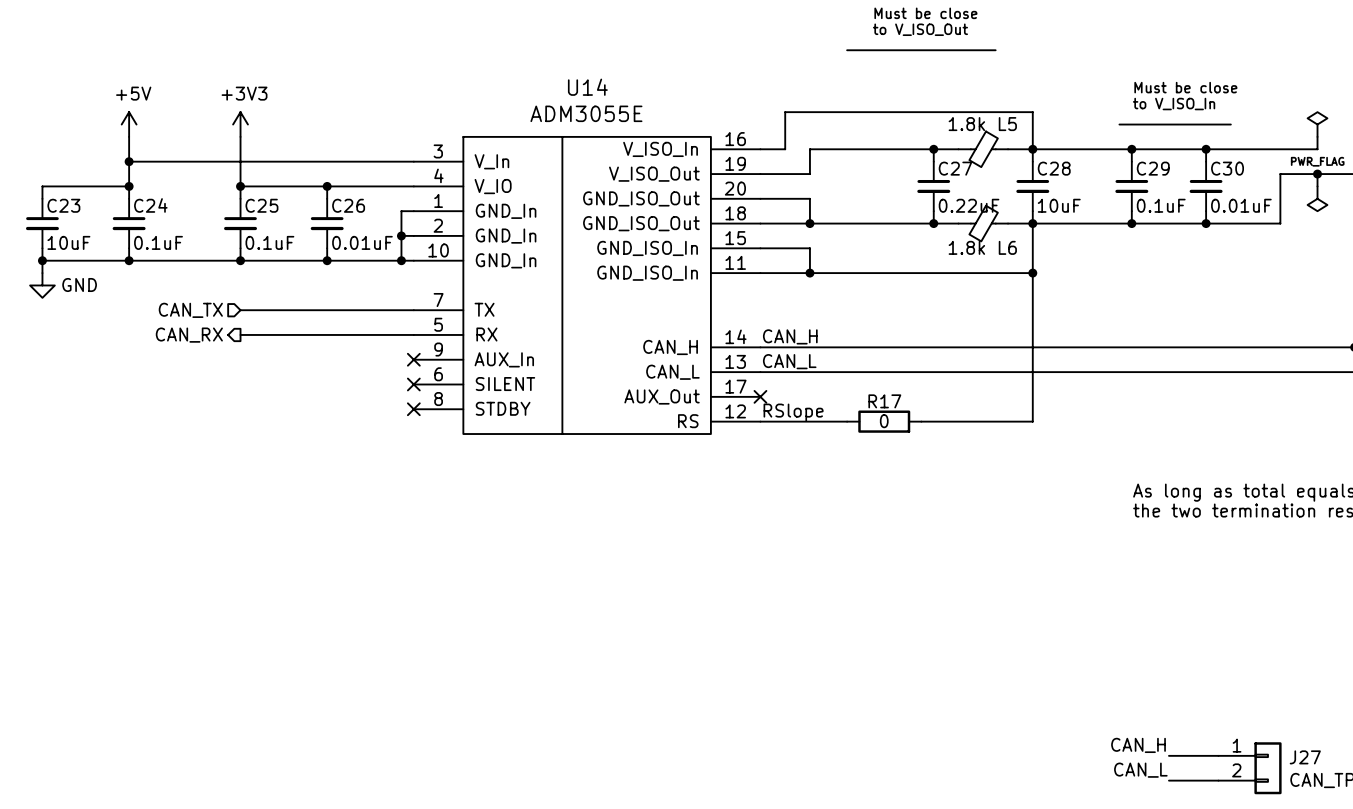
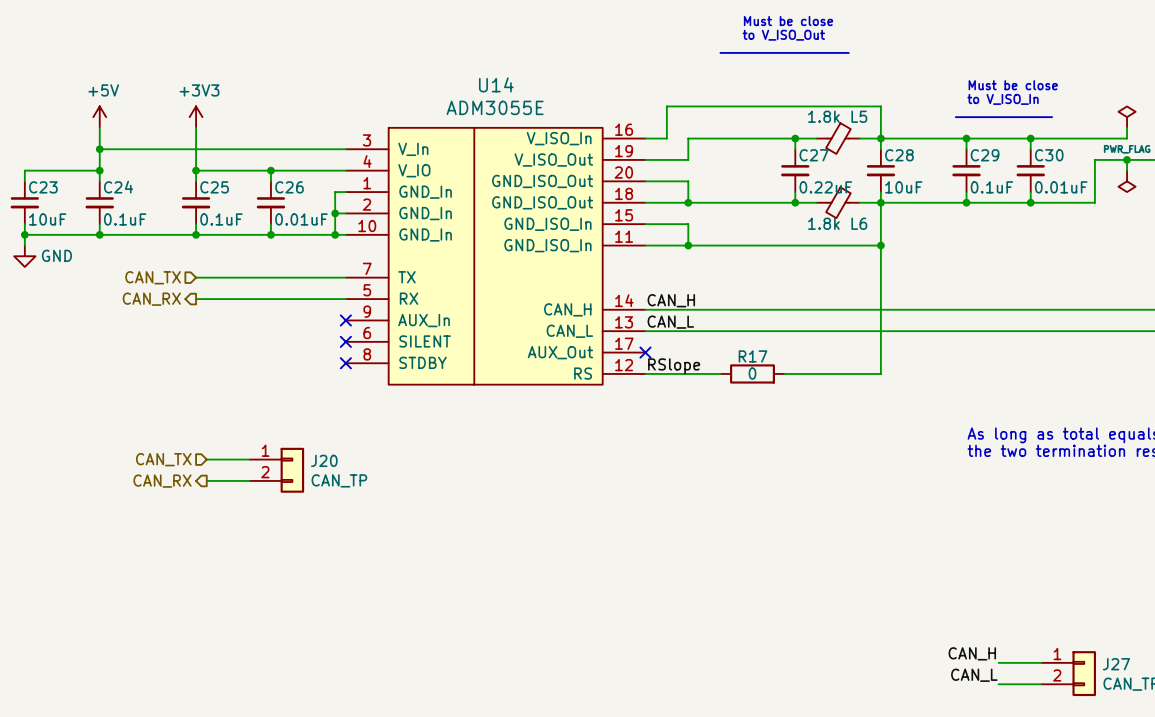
hierarchical label: none -> CAN_TX (163, 459)
wire: none -> (206, 459) (249, 459)
J20: none -> CAN_TP (276, 470)
hierarchical label: none -> CAN_RX (162, 481)
wire: none -> (206, 480) (249, 480)

